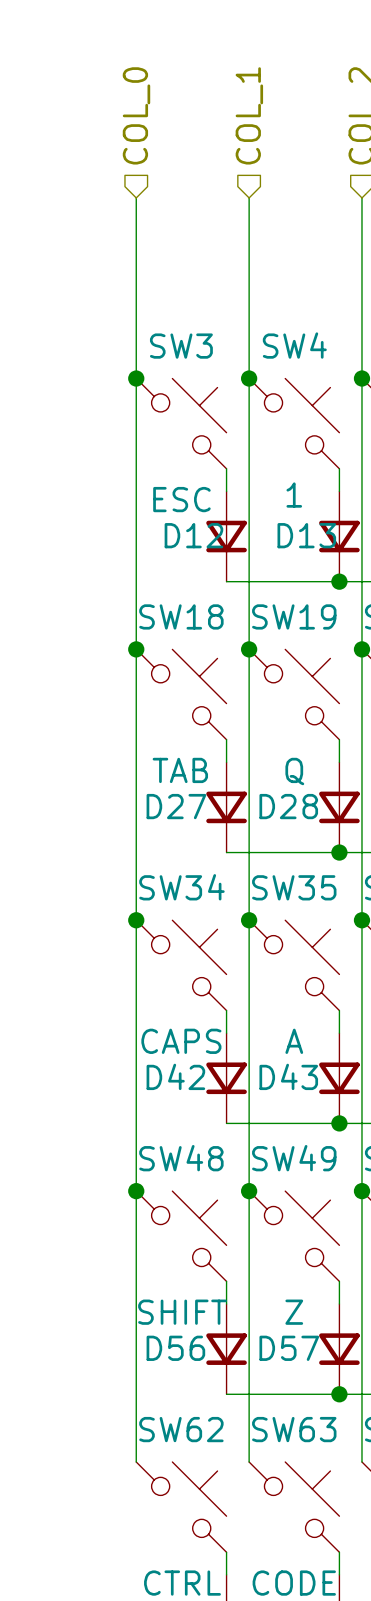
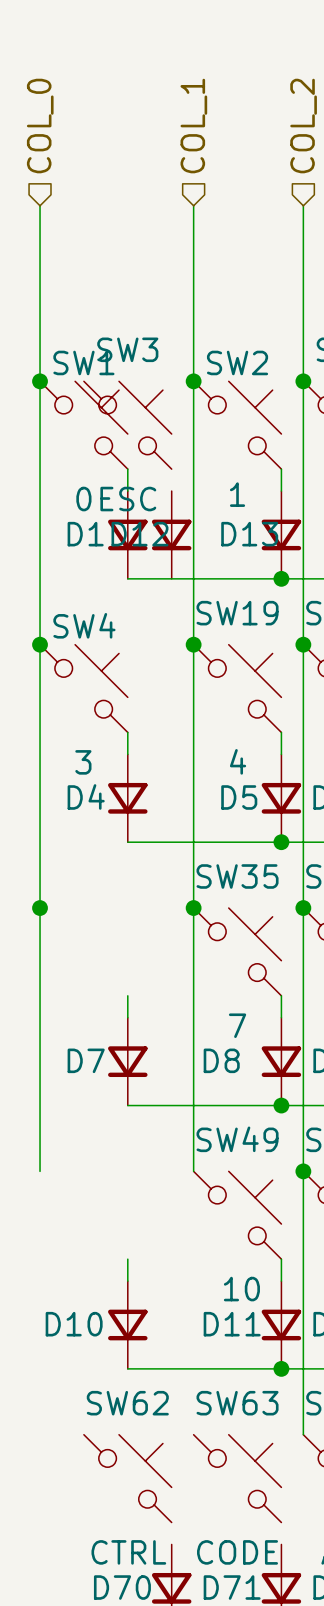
hierarchical label position: COL_0 (136, 115) -> COL_0 (40, 126)
wire: none -> (40, 205) (40, 1171)
wire: (136, 197) (136, 1462) -> none
SW4 name: SW4 (294, 345) -> SW2 (237, 362)
junction position: (136, 378) -> (40, 381)
SW1: none -> 0 (83, 425)
wire: (226, 468) (226, 491) -> (127, 469) (127, 491)
D1: none -> (127, 534)
wire: none -> (127, 578) (171, 578)
junction position: (136, 649) -> (40, 644)
SW4: none -> 3 (83, 688)
SW18: TAB (181, 694) -> none
wire: (226, 739) (226, 762) -> (127, 732) (127, 754)
SW19 value: Q (294, 771) -> 4 (238, 761)
D28 name: D28 (288, 806) -> D5 (239, 797)
D4: none -> (127, 798)
D27: (226, 807) -> none
wire: none -> (127, 842) (171, 842)
junction position: (136, 920) -> (40, 908)
SW34: CAPS (181, 965) -> none
wire: (226, 1010) (226, 1033) -> (127, 995) (127, 1017)
SW35 value: A (294, 1041) -> 7 (237, 1025)
D43 name: D43 (288, 1076) -> D8 (221, 1060)
D7: none -> (127, 1061)
D42: (226, 1078) -> none
wire: none -> (127, 1105) (171, 1105)
junction: (136, 1191) -> none
wire: (249, 1191) (249, 1462) -> none
junction: (249, 1191) -> none
SW48: SHIFT (181, 1236) -> none
wire: (226, 1281) (226, 1304) -> (127, 1259) (127, 1281)
SW49 value: Z (294, 1312) -> 10 (241, 1289)
D57 name: D57 (289, 1348) -> D11 (232, 1324)
D10: none -> (127, 1325)
D56: (226, 1349) -> none
wire: none -> (127, 1368) (171, 1368)
wire: (226, 1552) (226, 1574) -> none
wire: (339, 1552) (339, 1574) -> none

